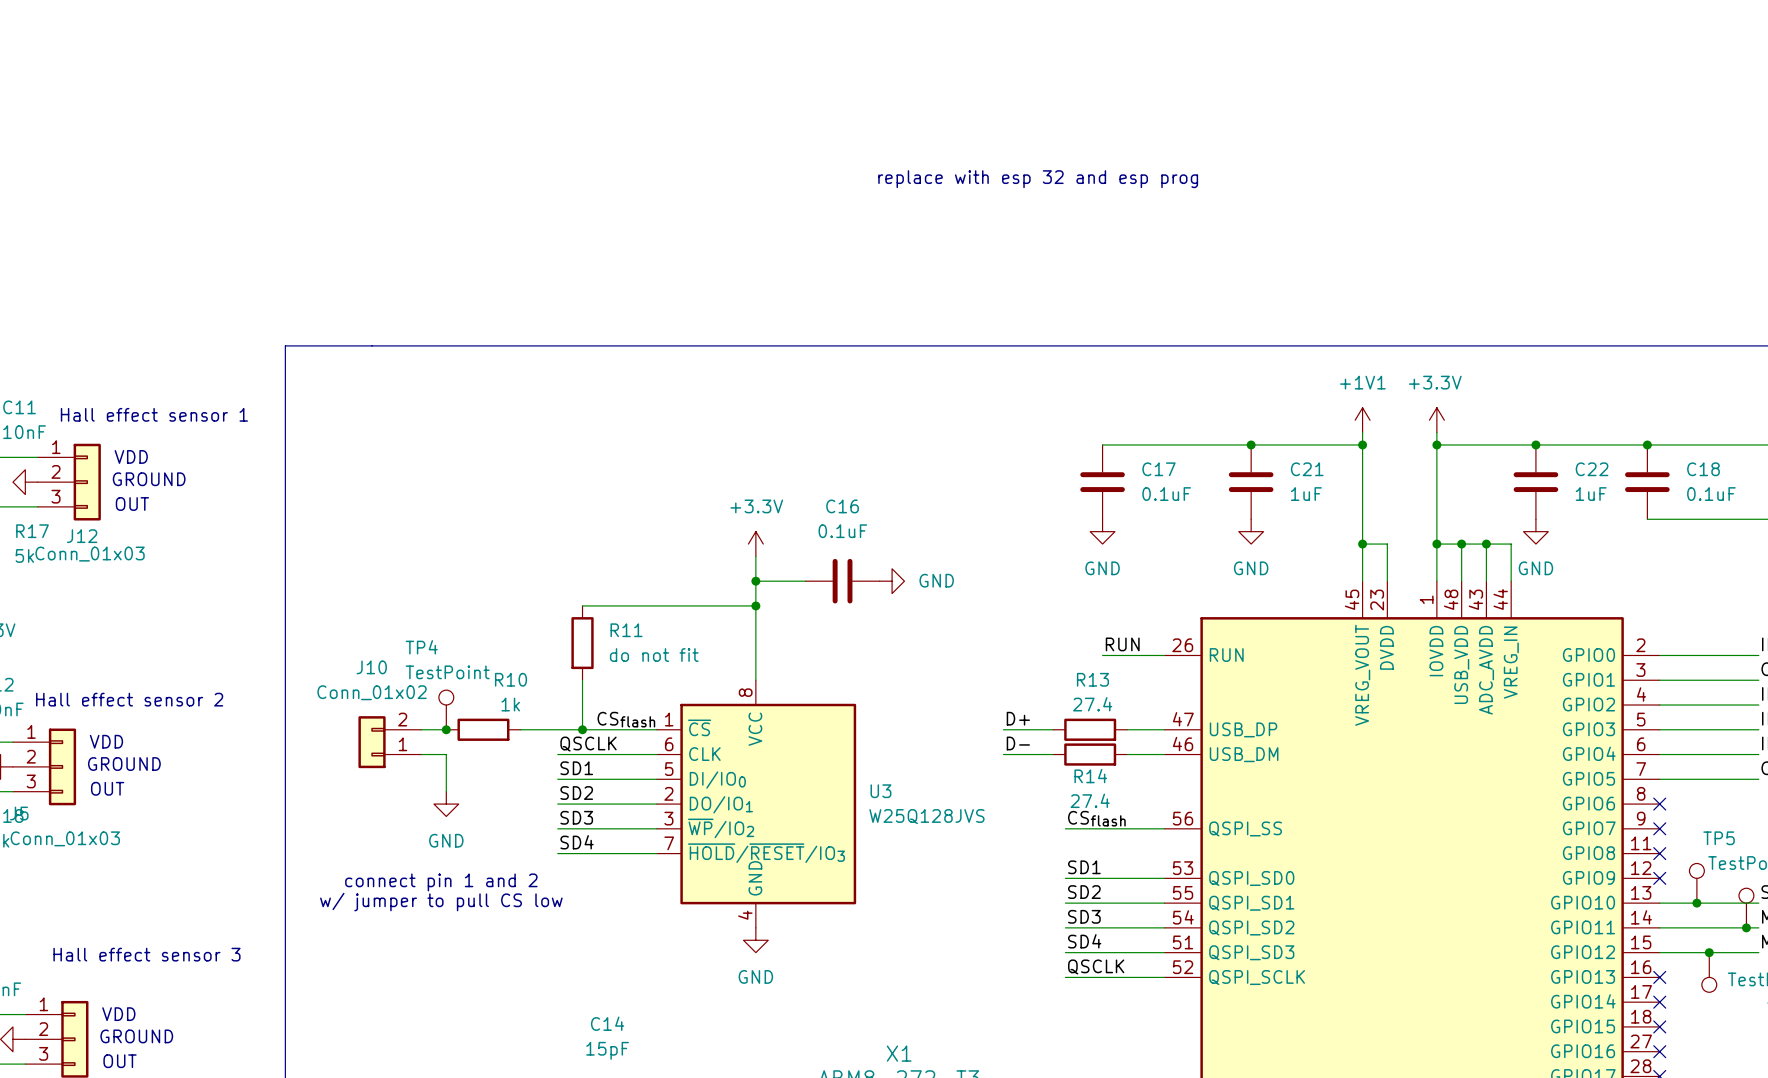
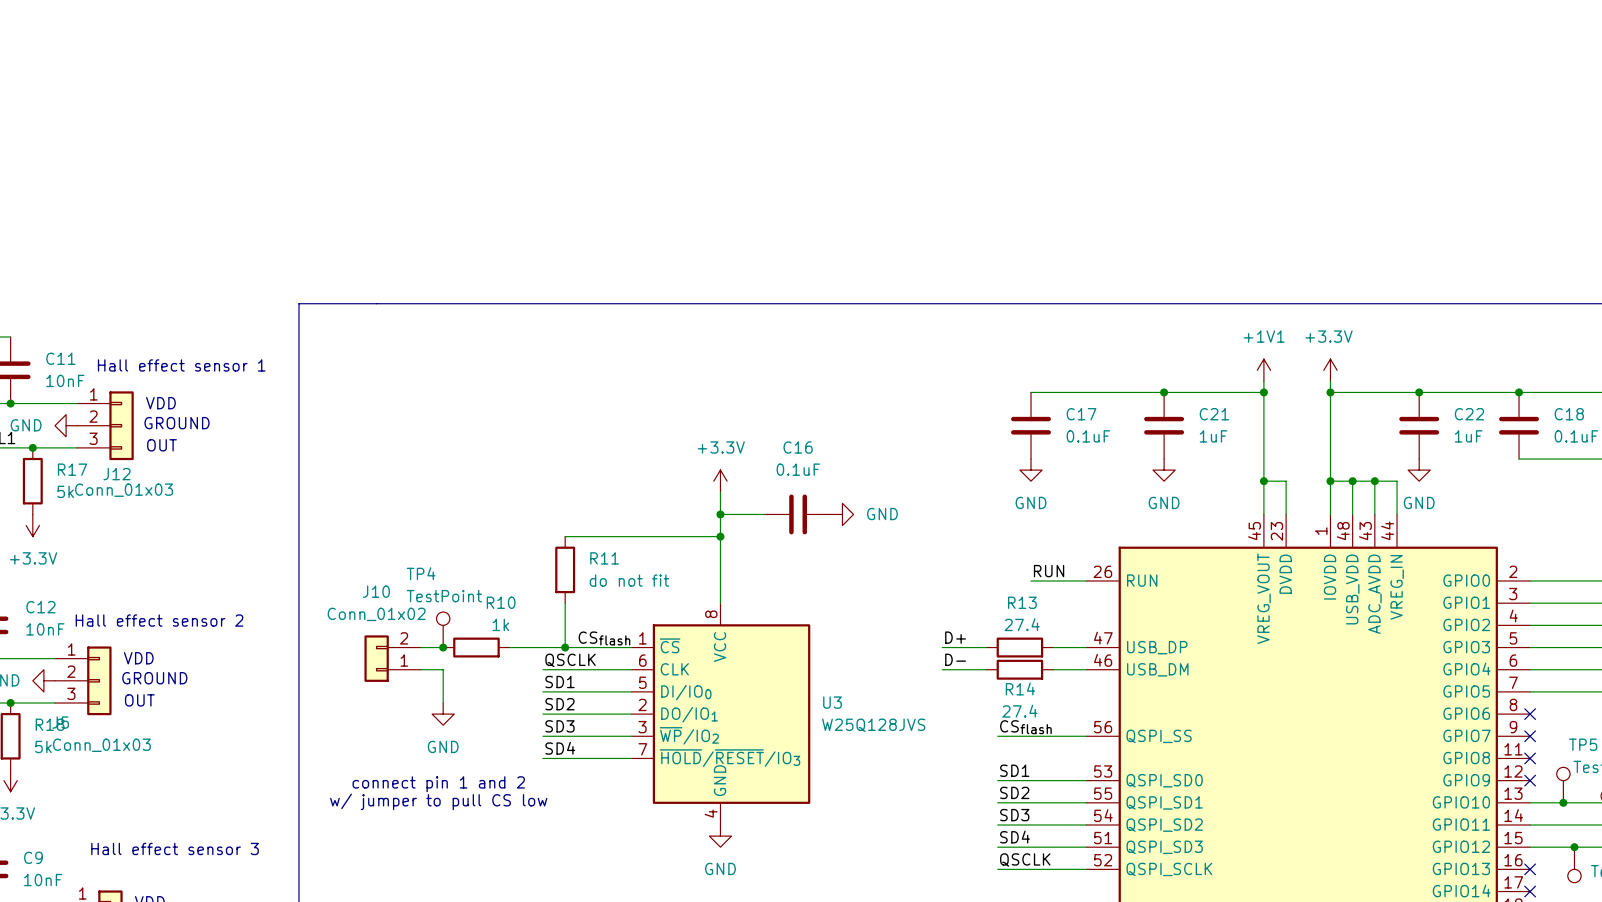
text: replace with esp 32 and esp prog (1038, 179) -> none

